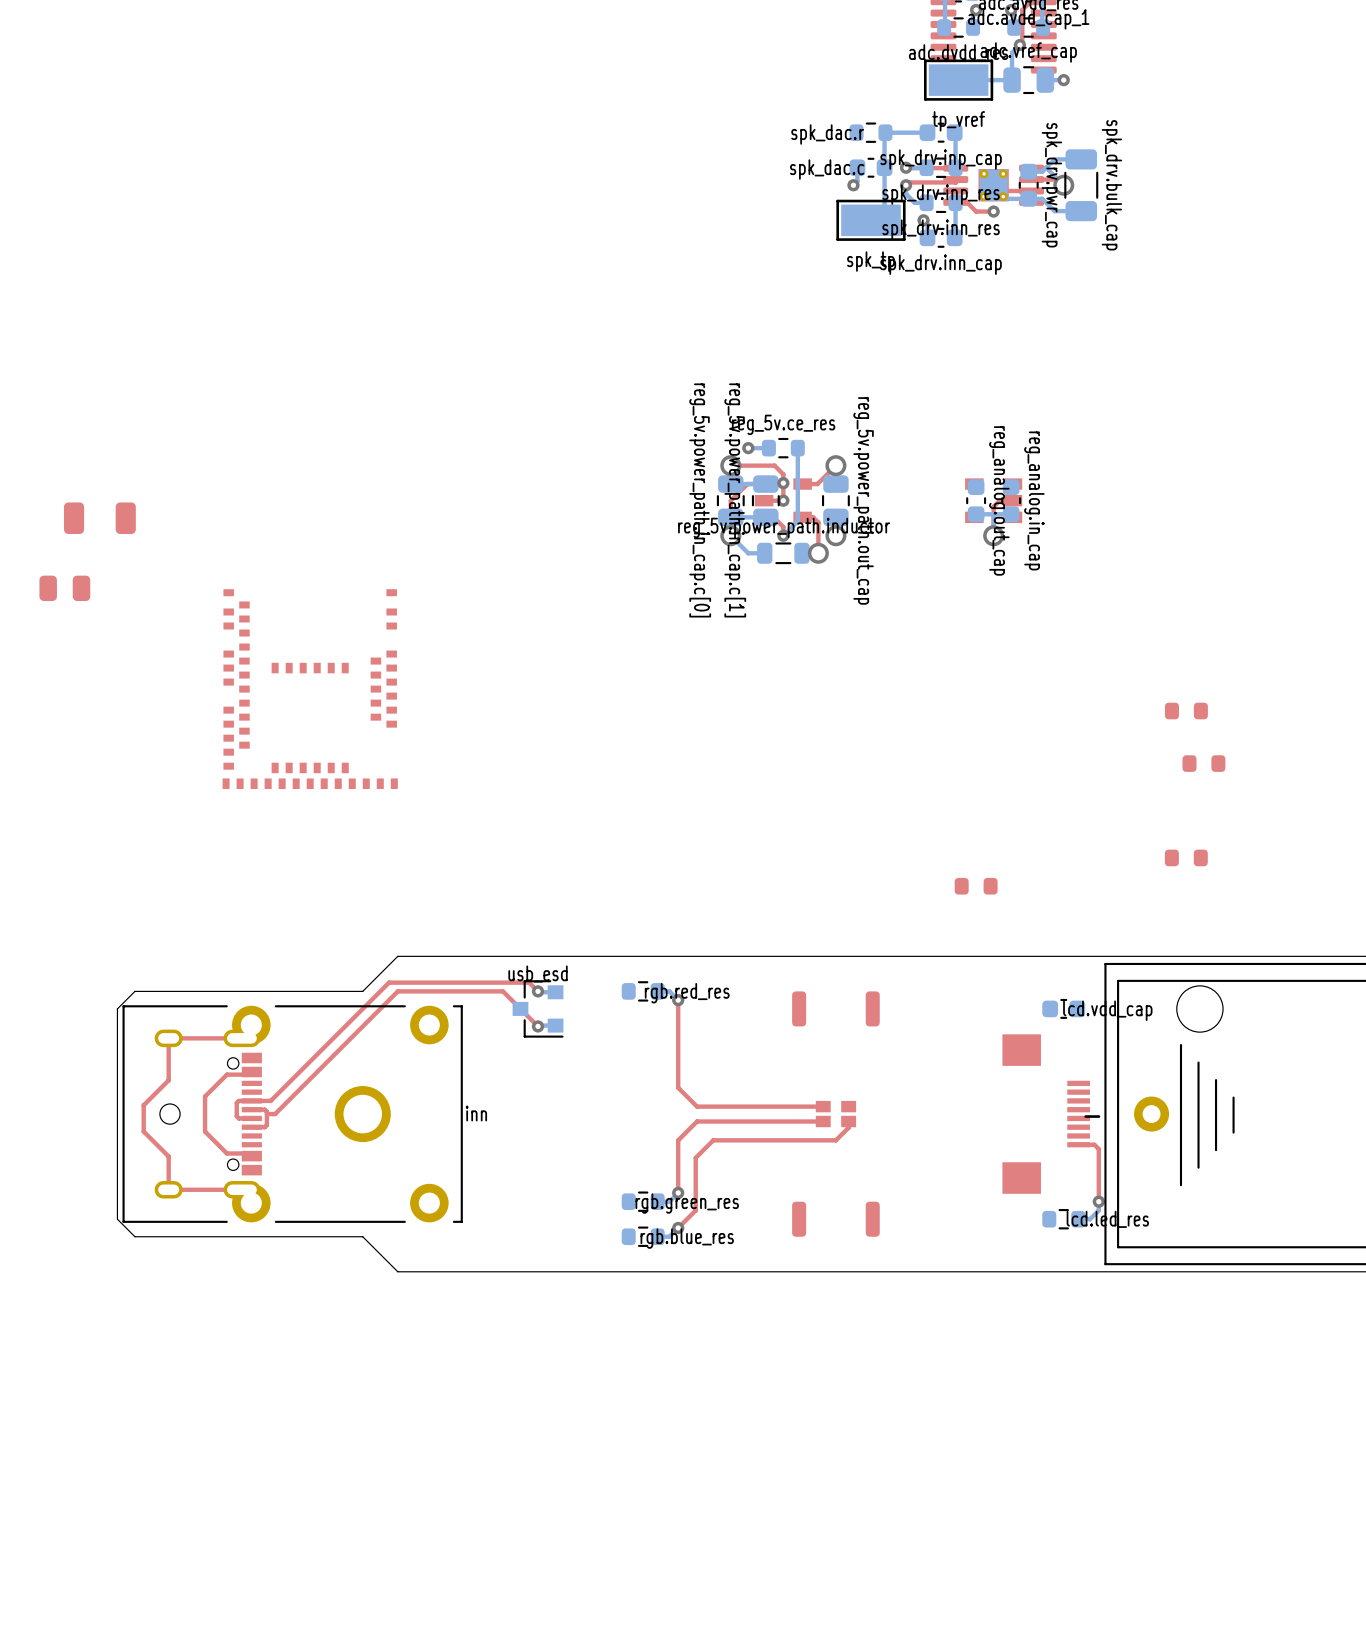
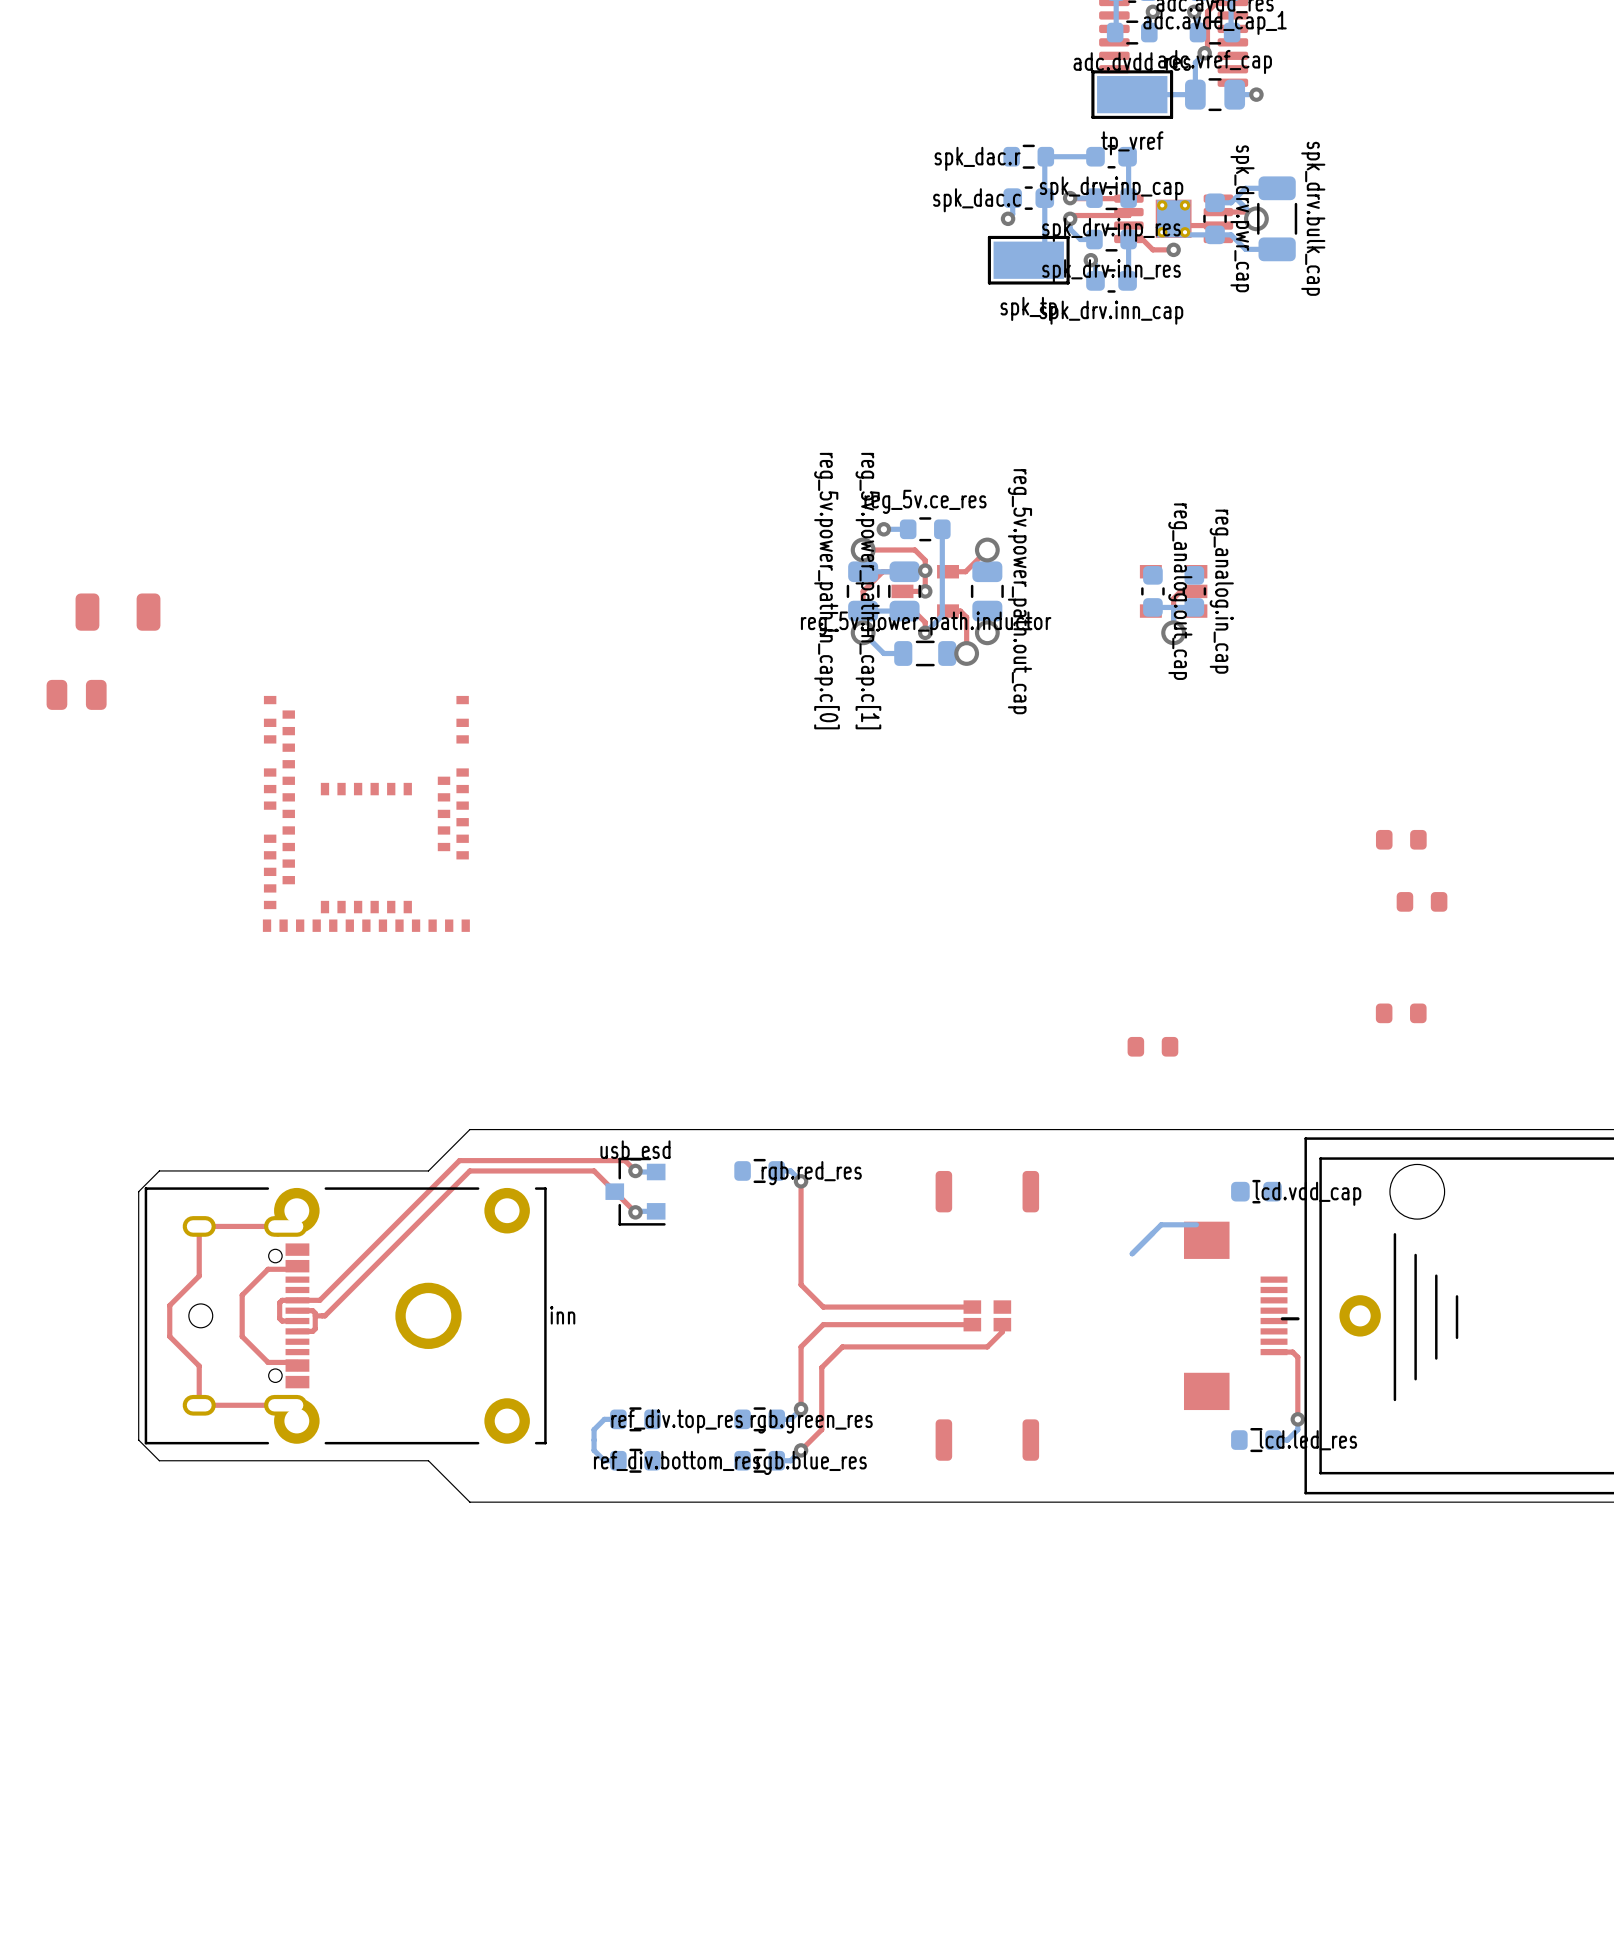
bottom track: none -> (1196, 1224) (1161, 1224) (1132, 1253)
bottom track: none -> (618, 1419) (604, 1419) (594, 1429) (594, 1450) (604, 1460) (618, 1460)
ref_div.top_res: none -> (635, 1419)
ref_div.bottom_res: none -> (635, 1460)

